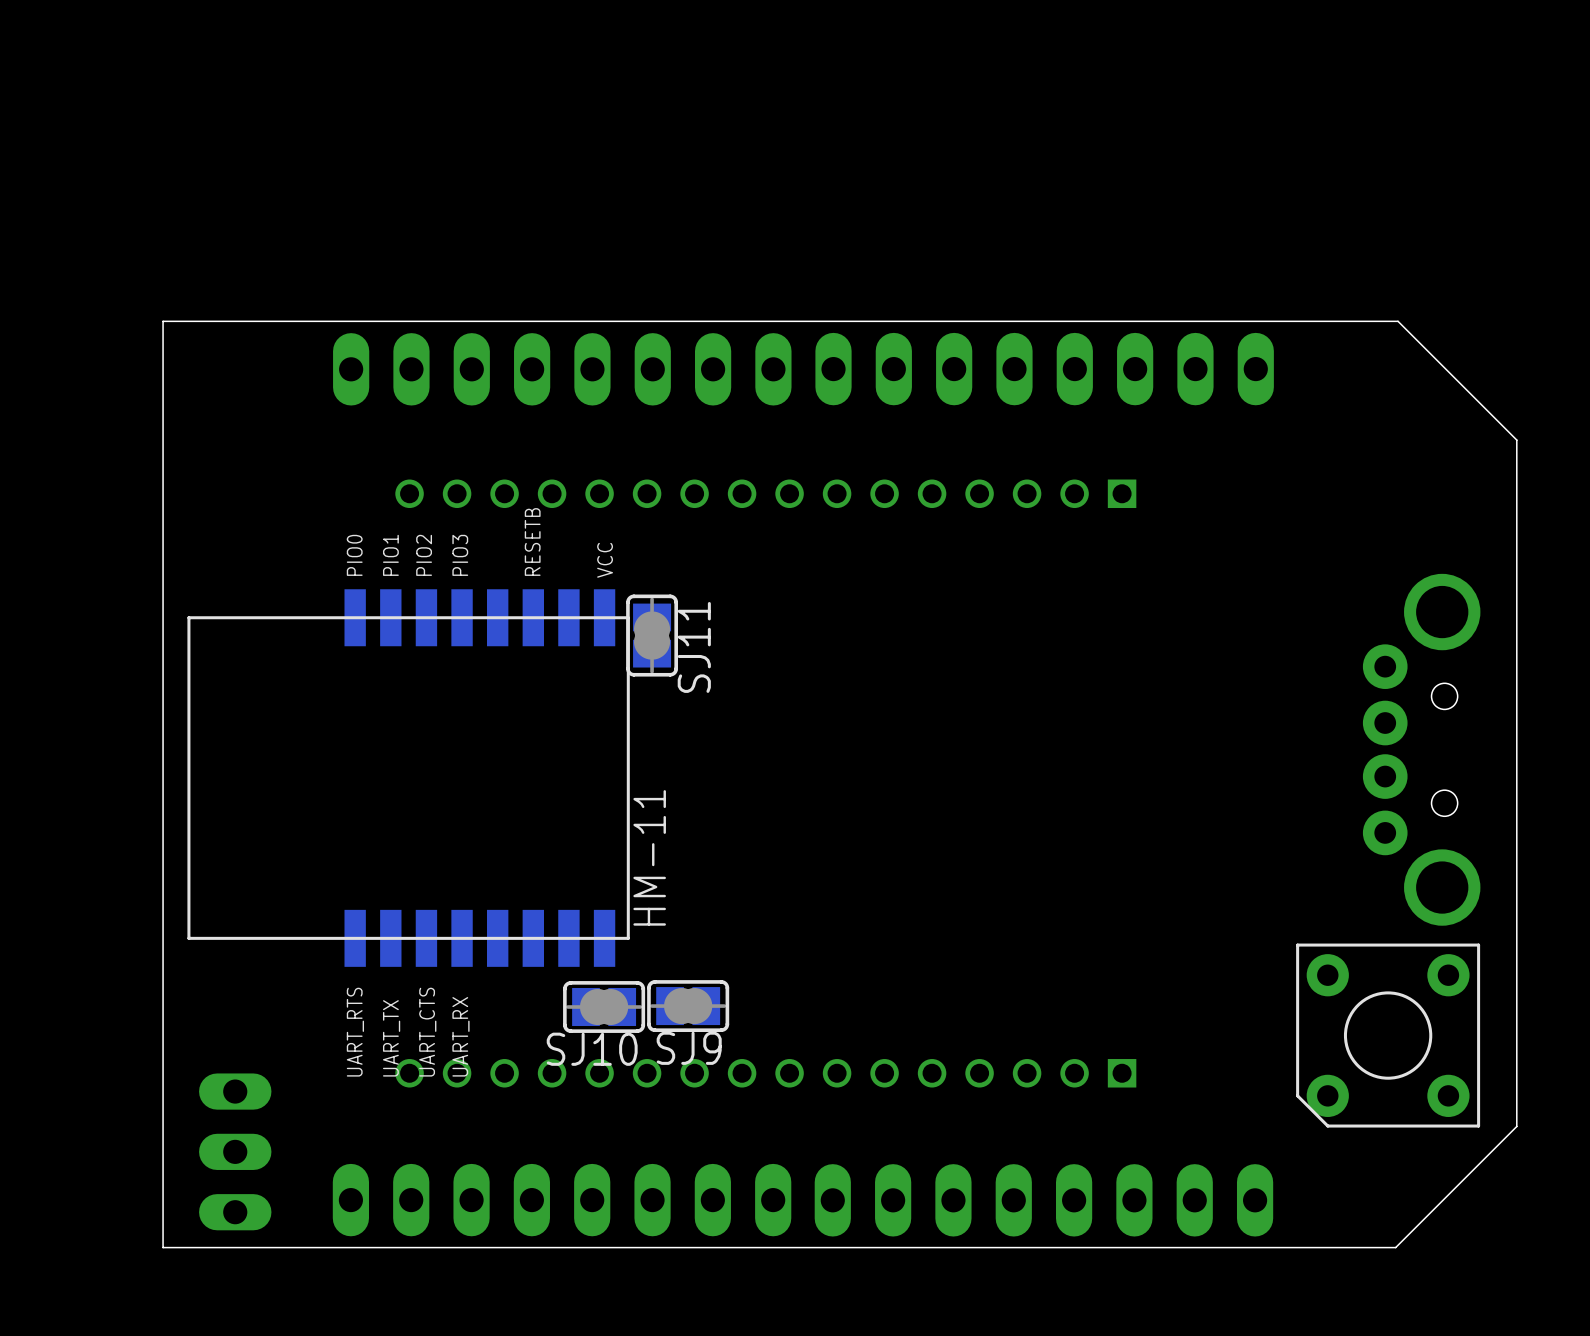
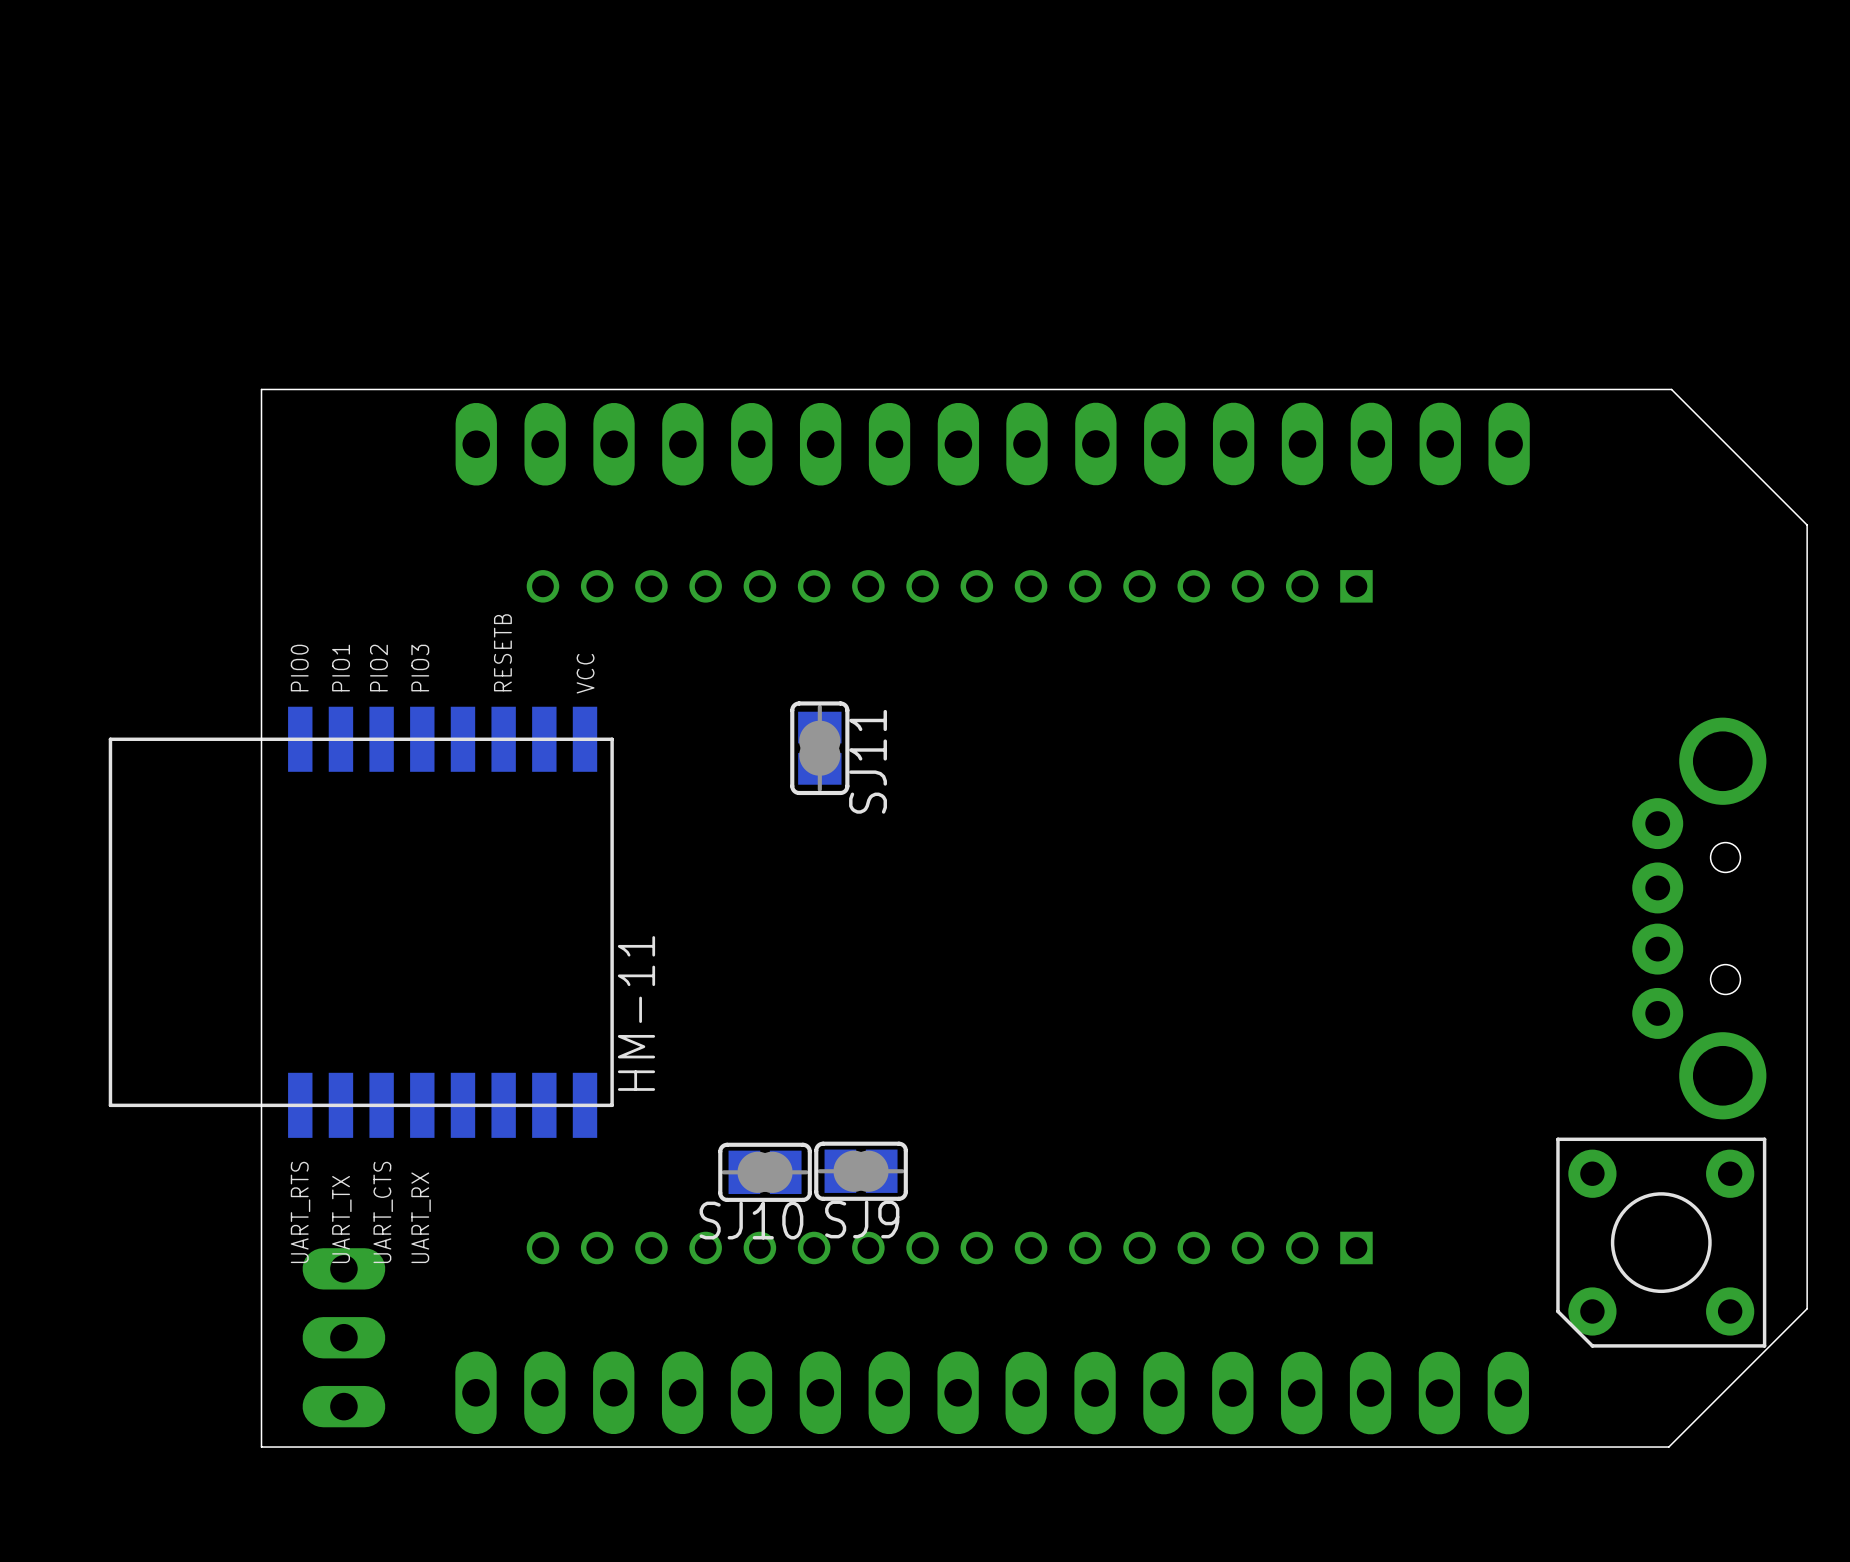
part position: (1421, 749) -> (1699, 918)
part position: (408, 778) -> (361, 922)
part position: (1388, 1035) -> (1661, 1242)

